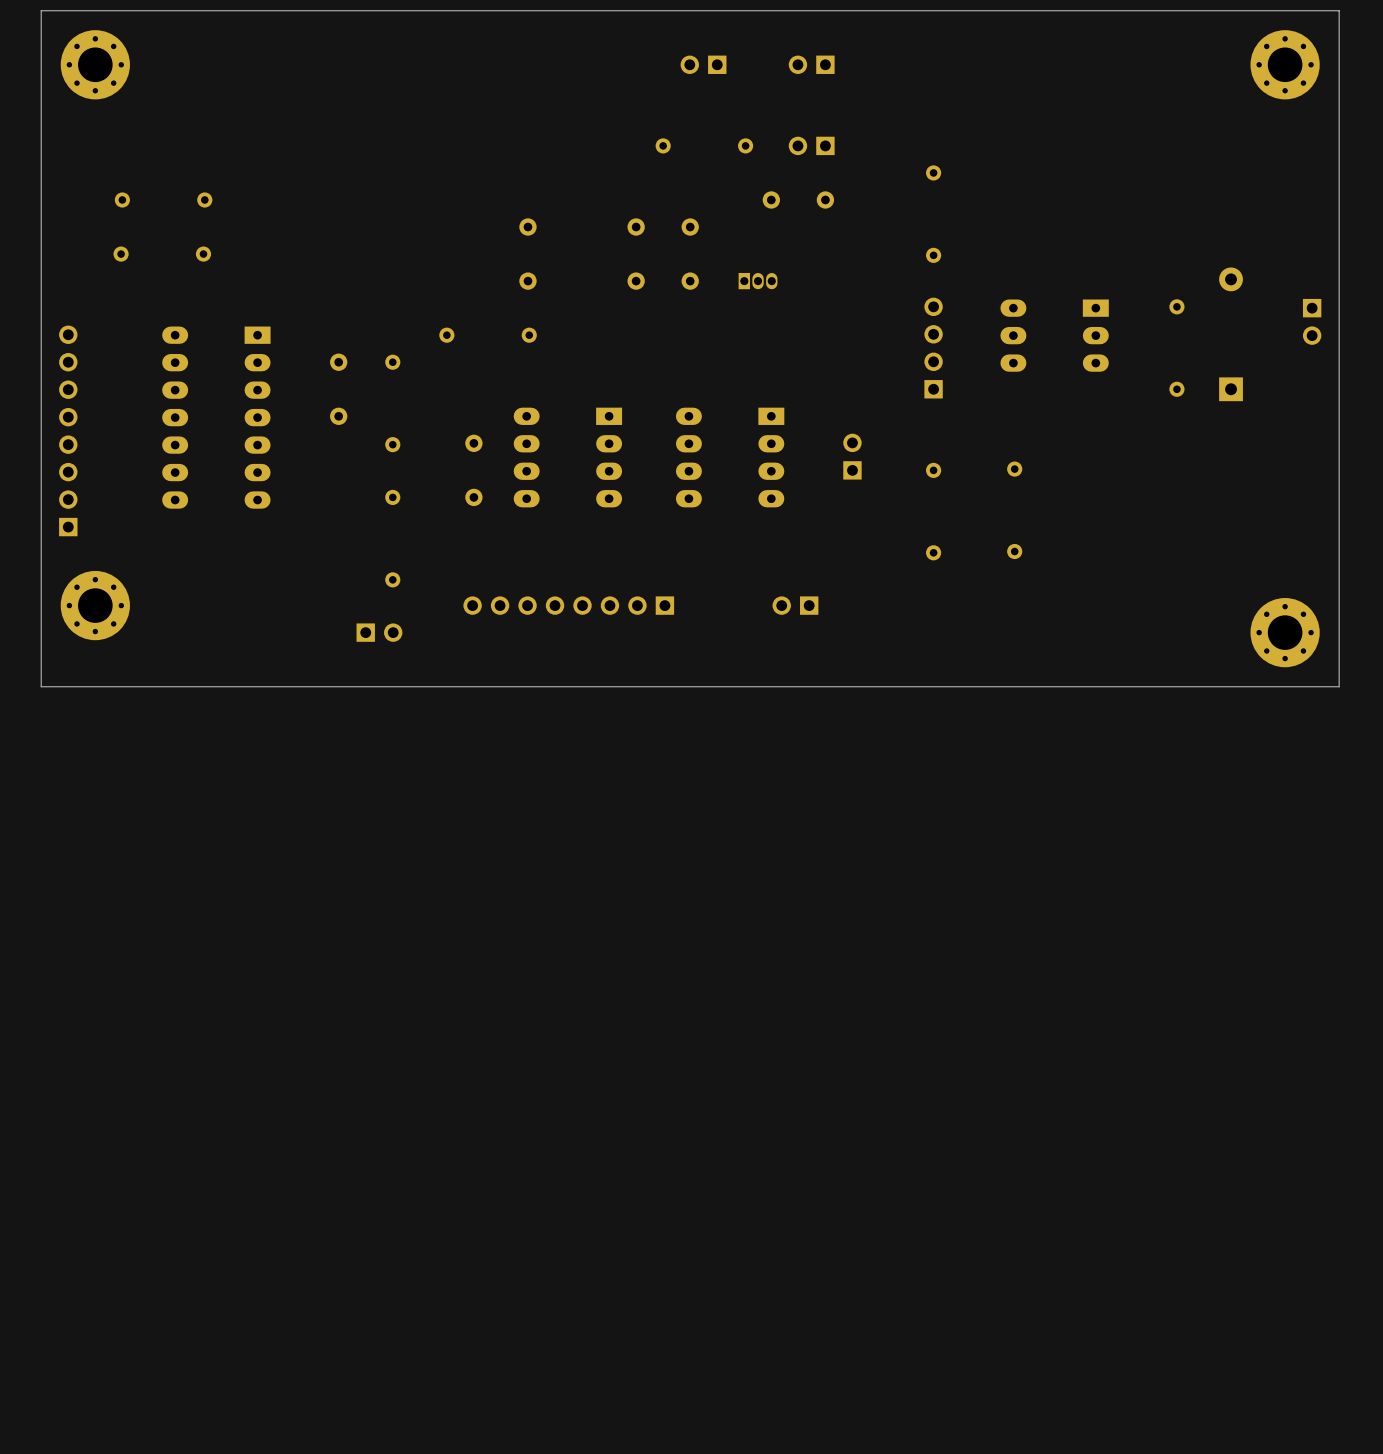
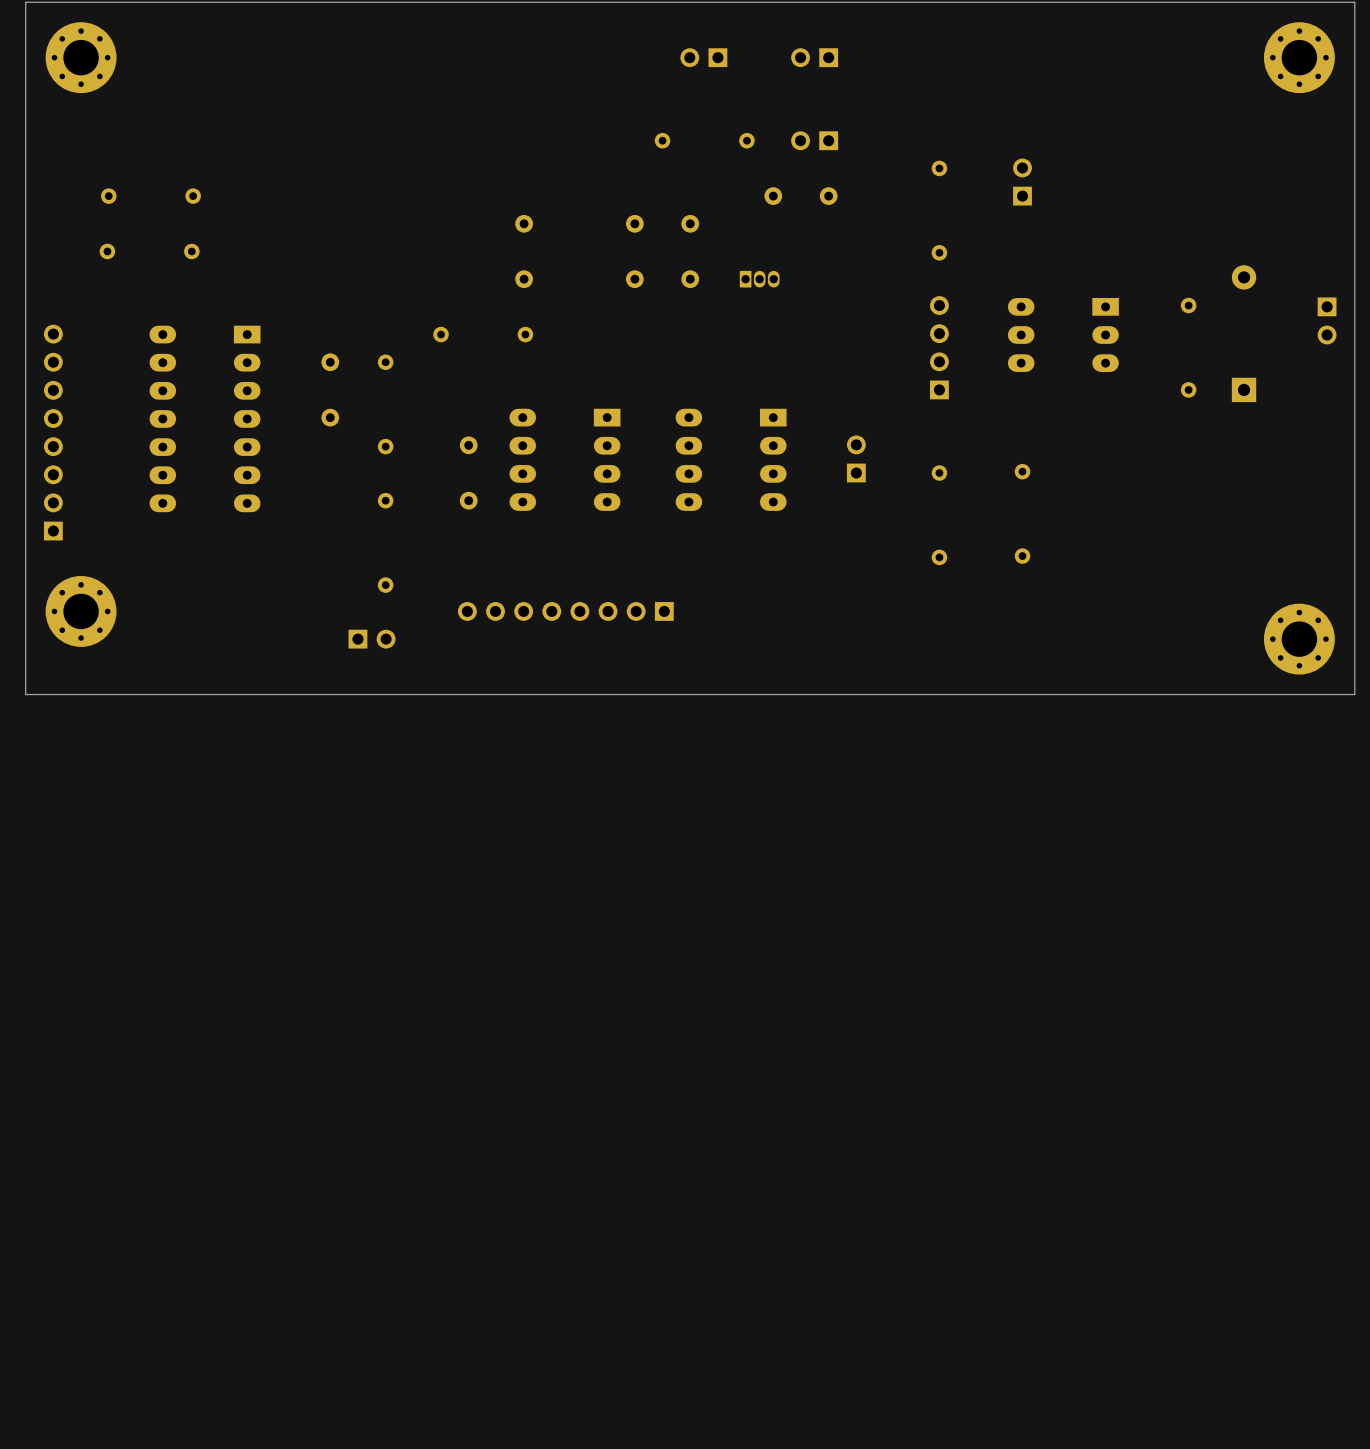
part: none -> (1022, 182)
part: (795, 605) -> none

